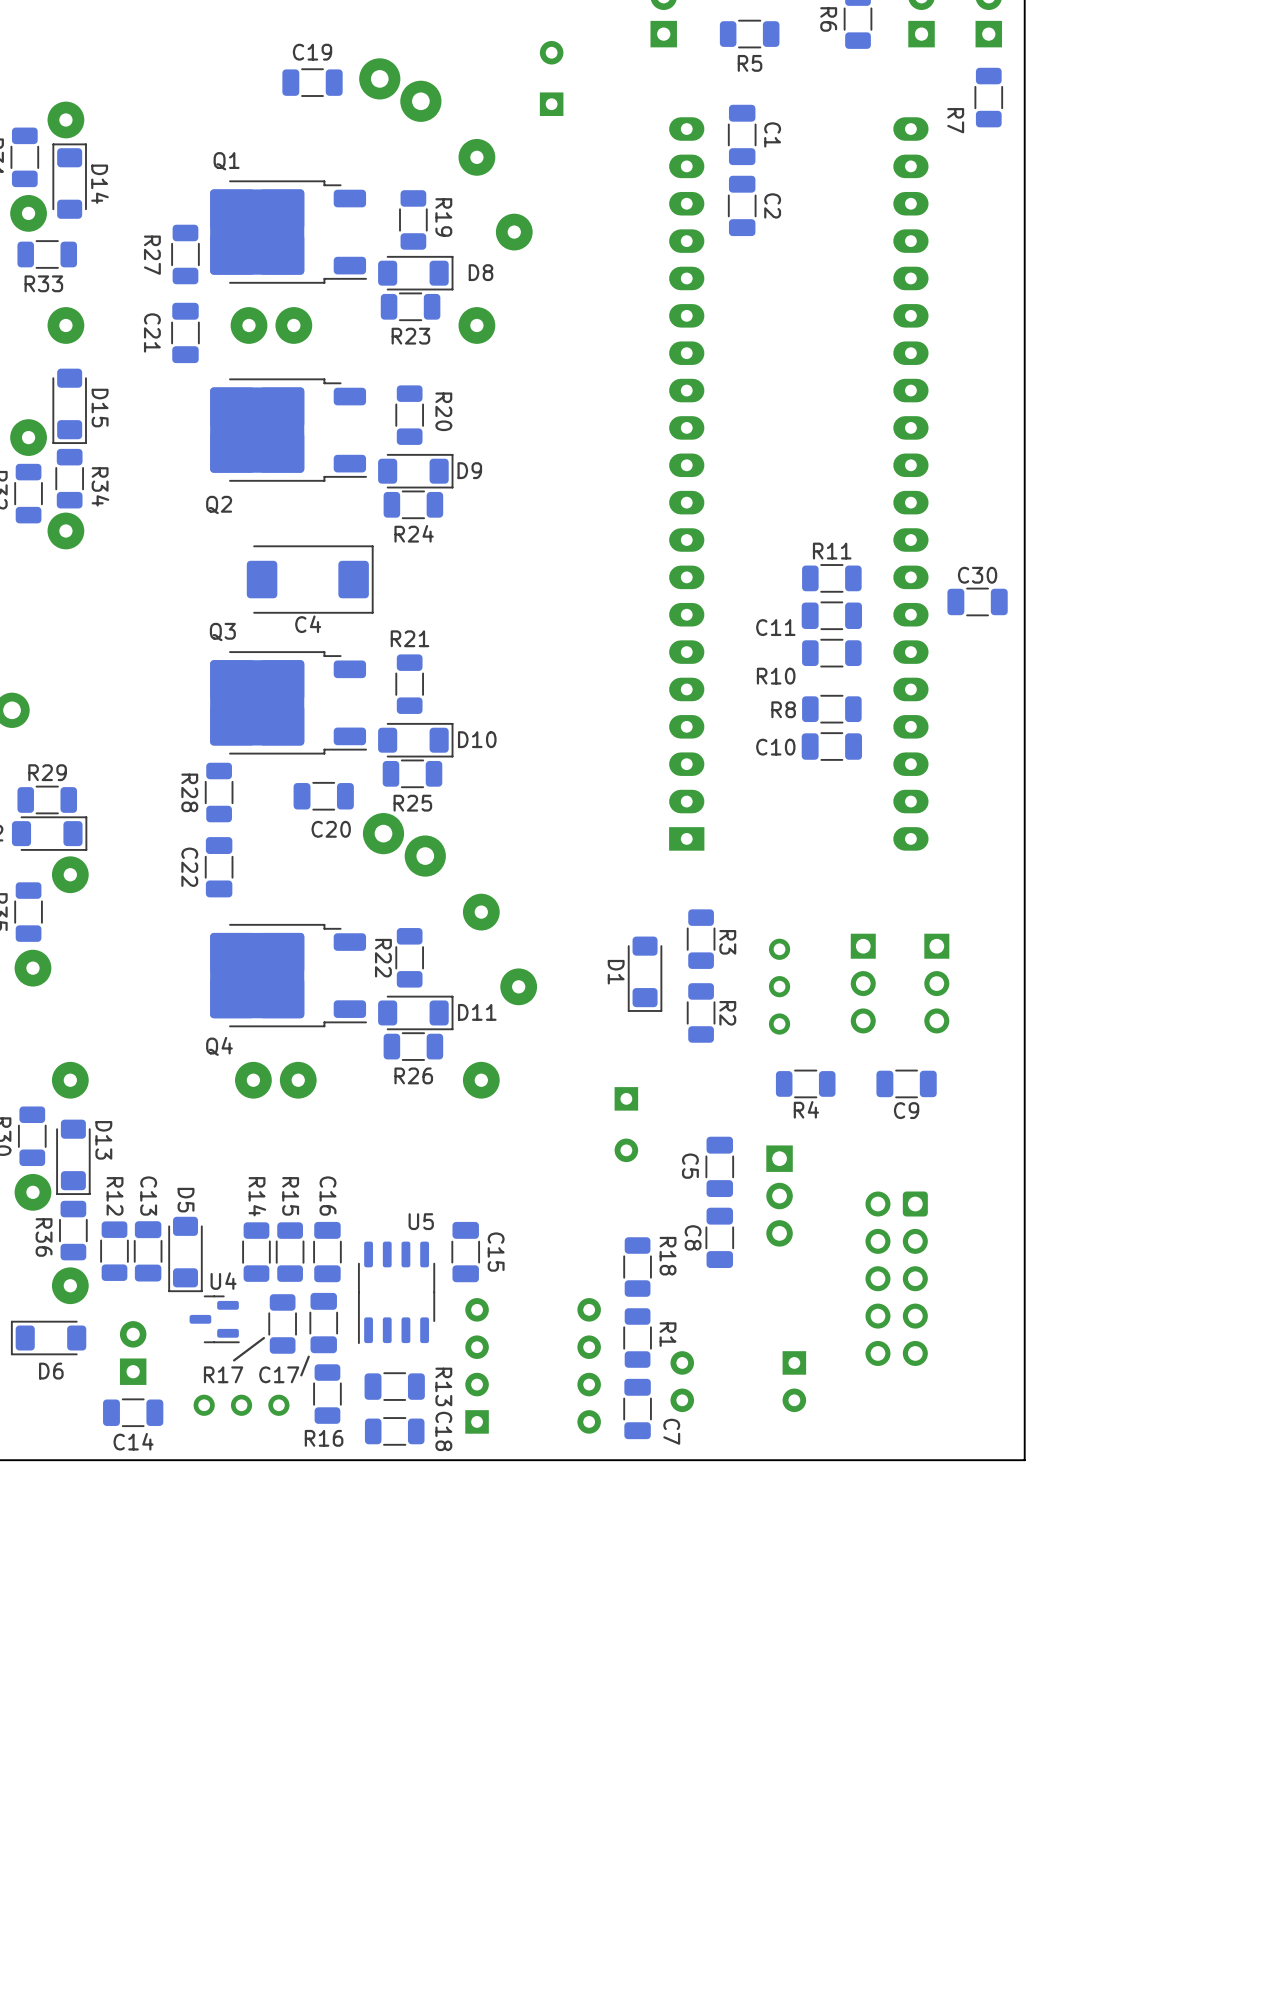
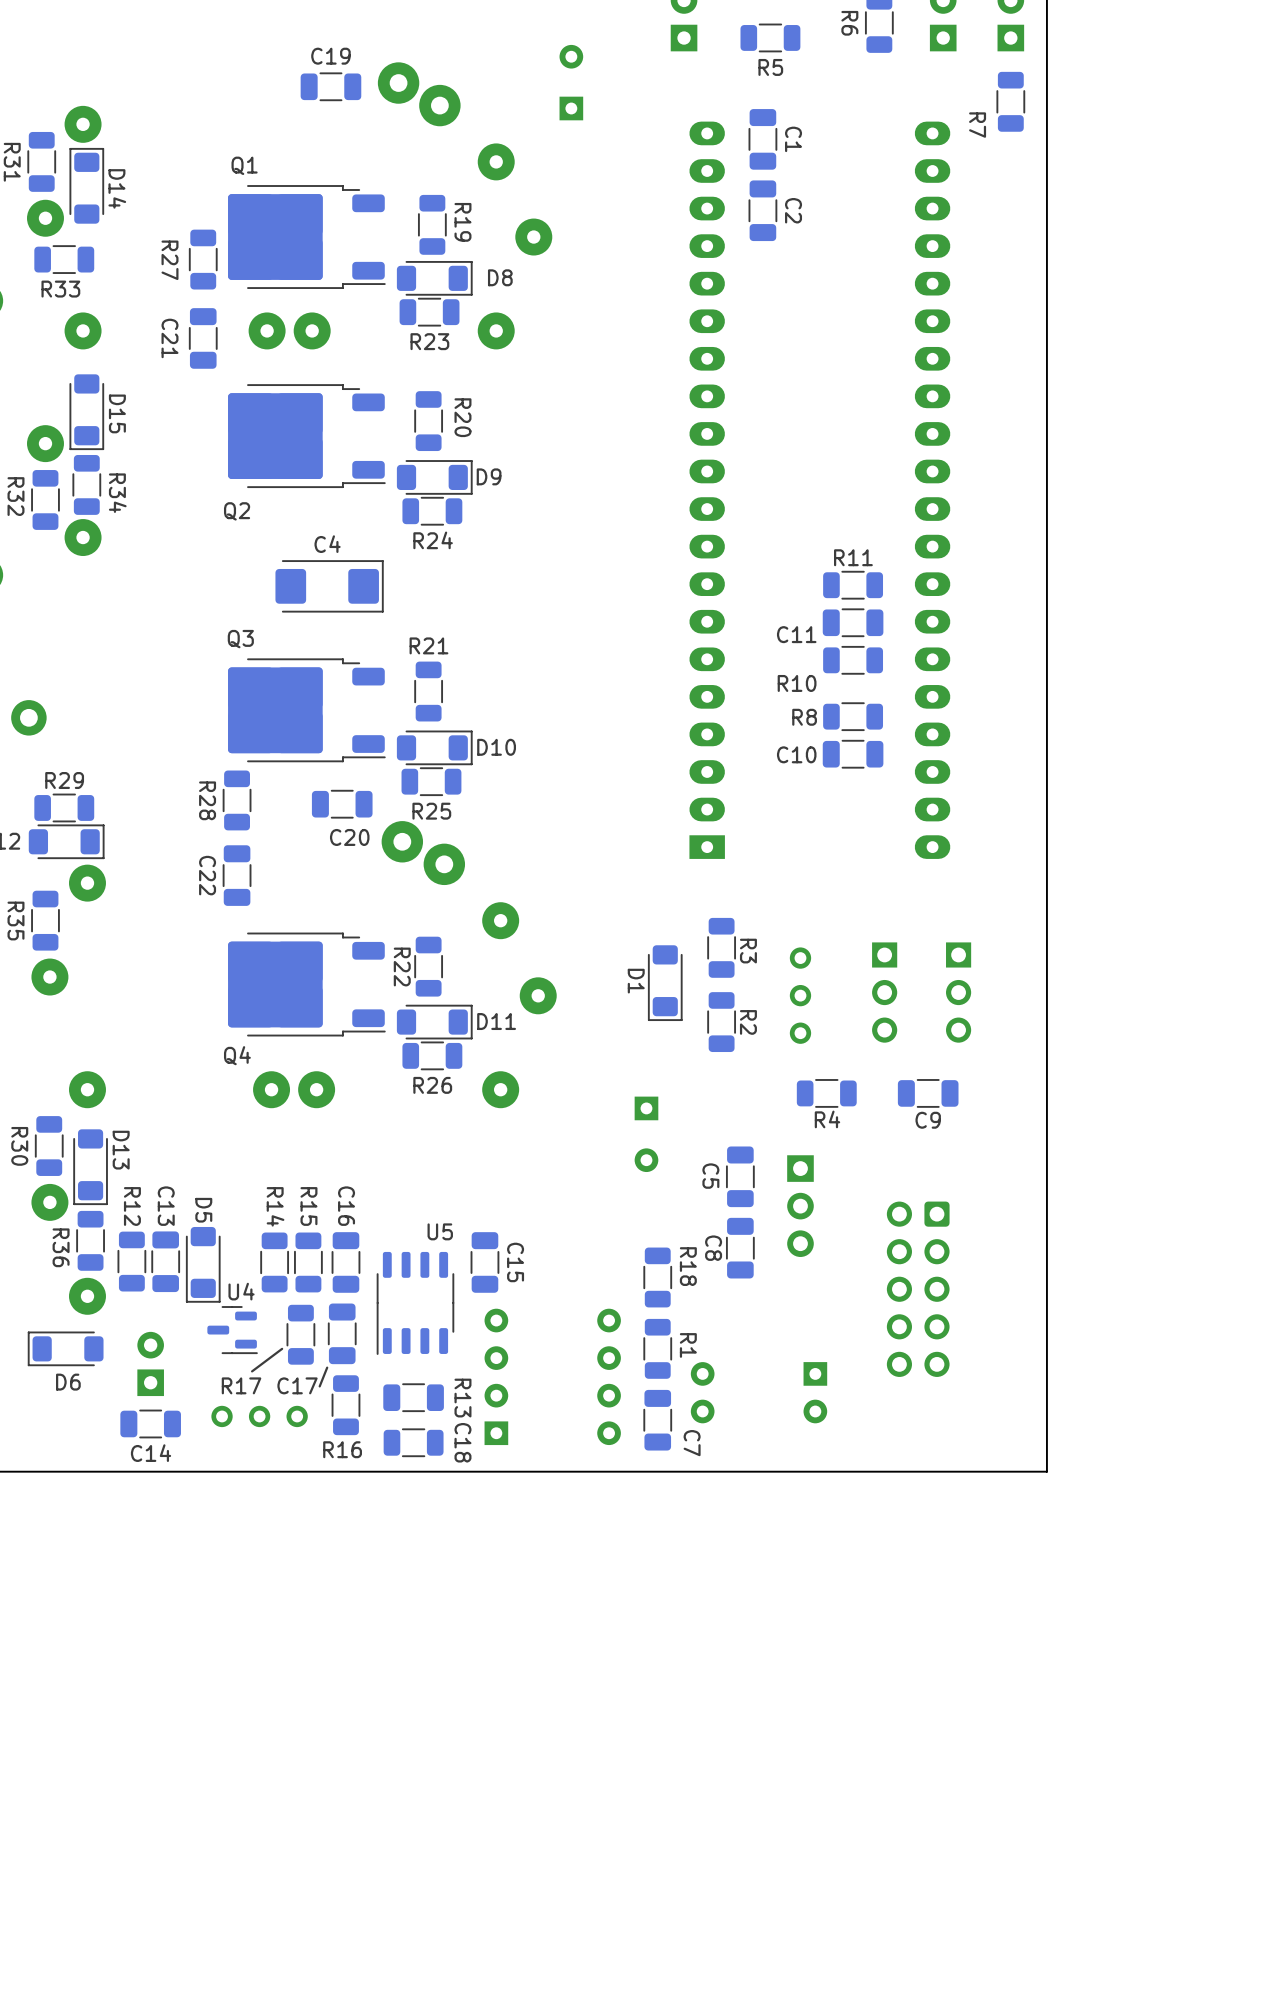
C4 footprint: [246, 545, 374, 614] -> [275, 560, 384, 613]
C30: (977, 601) -> none
C4 name position: C4 (308, 624) -> C4 (327, 544)

